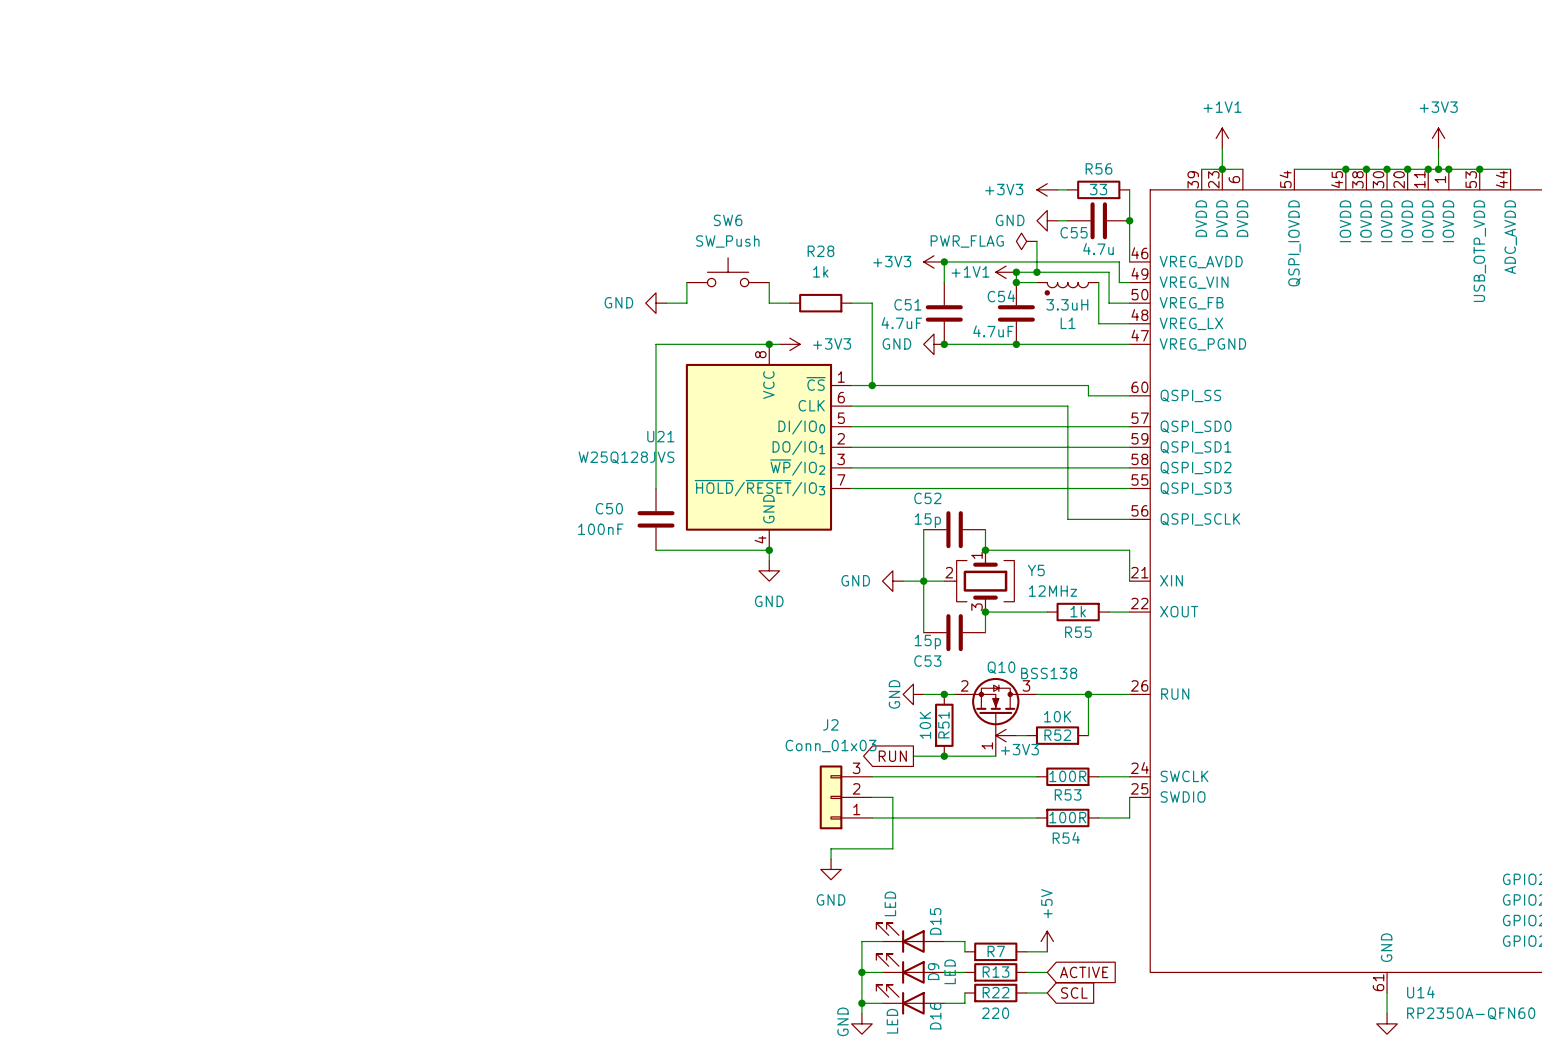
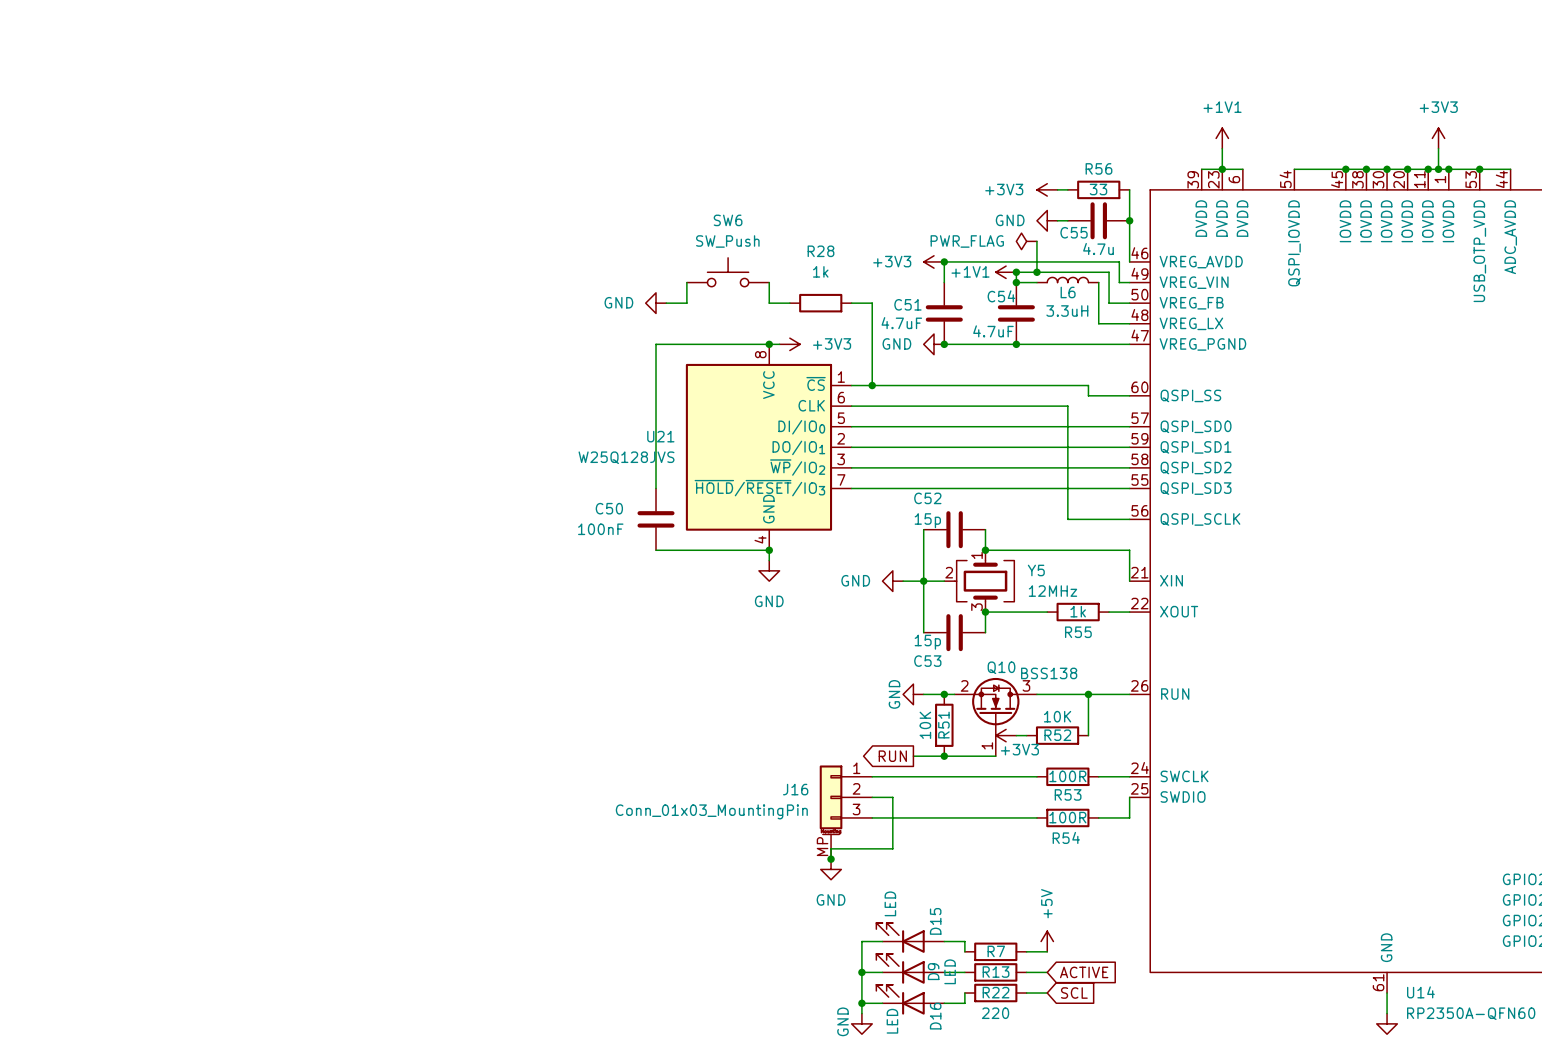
L6: none -> 3.3uH (1067, 280)
L1: 3.3uH (1067, 288) -> none
J2: Conn_01x03 (845, 797) -> none
J16: none -> Conn_01x03_MountingPin (845, 812)
junction: none -> (831, 859)

